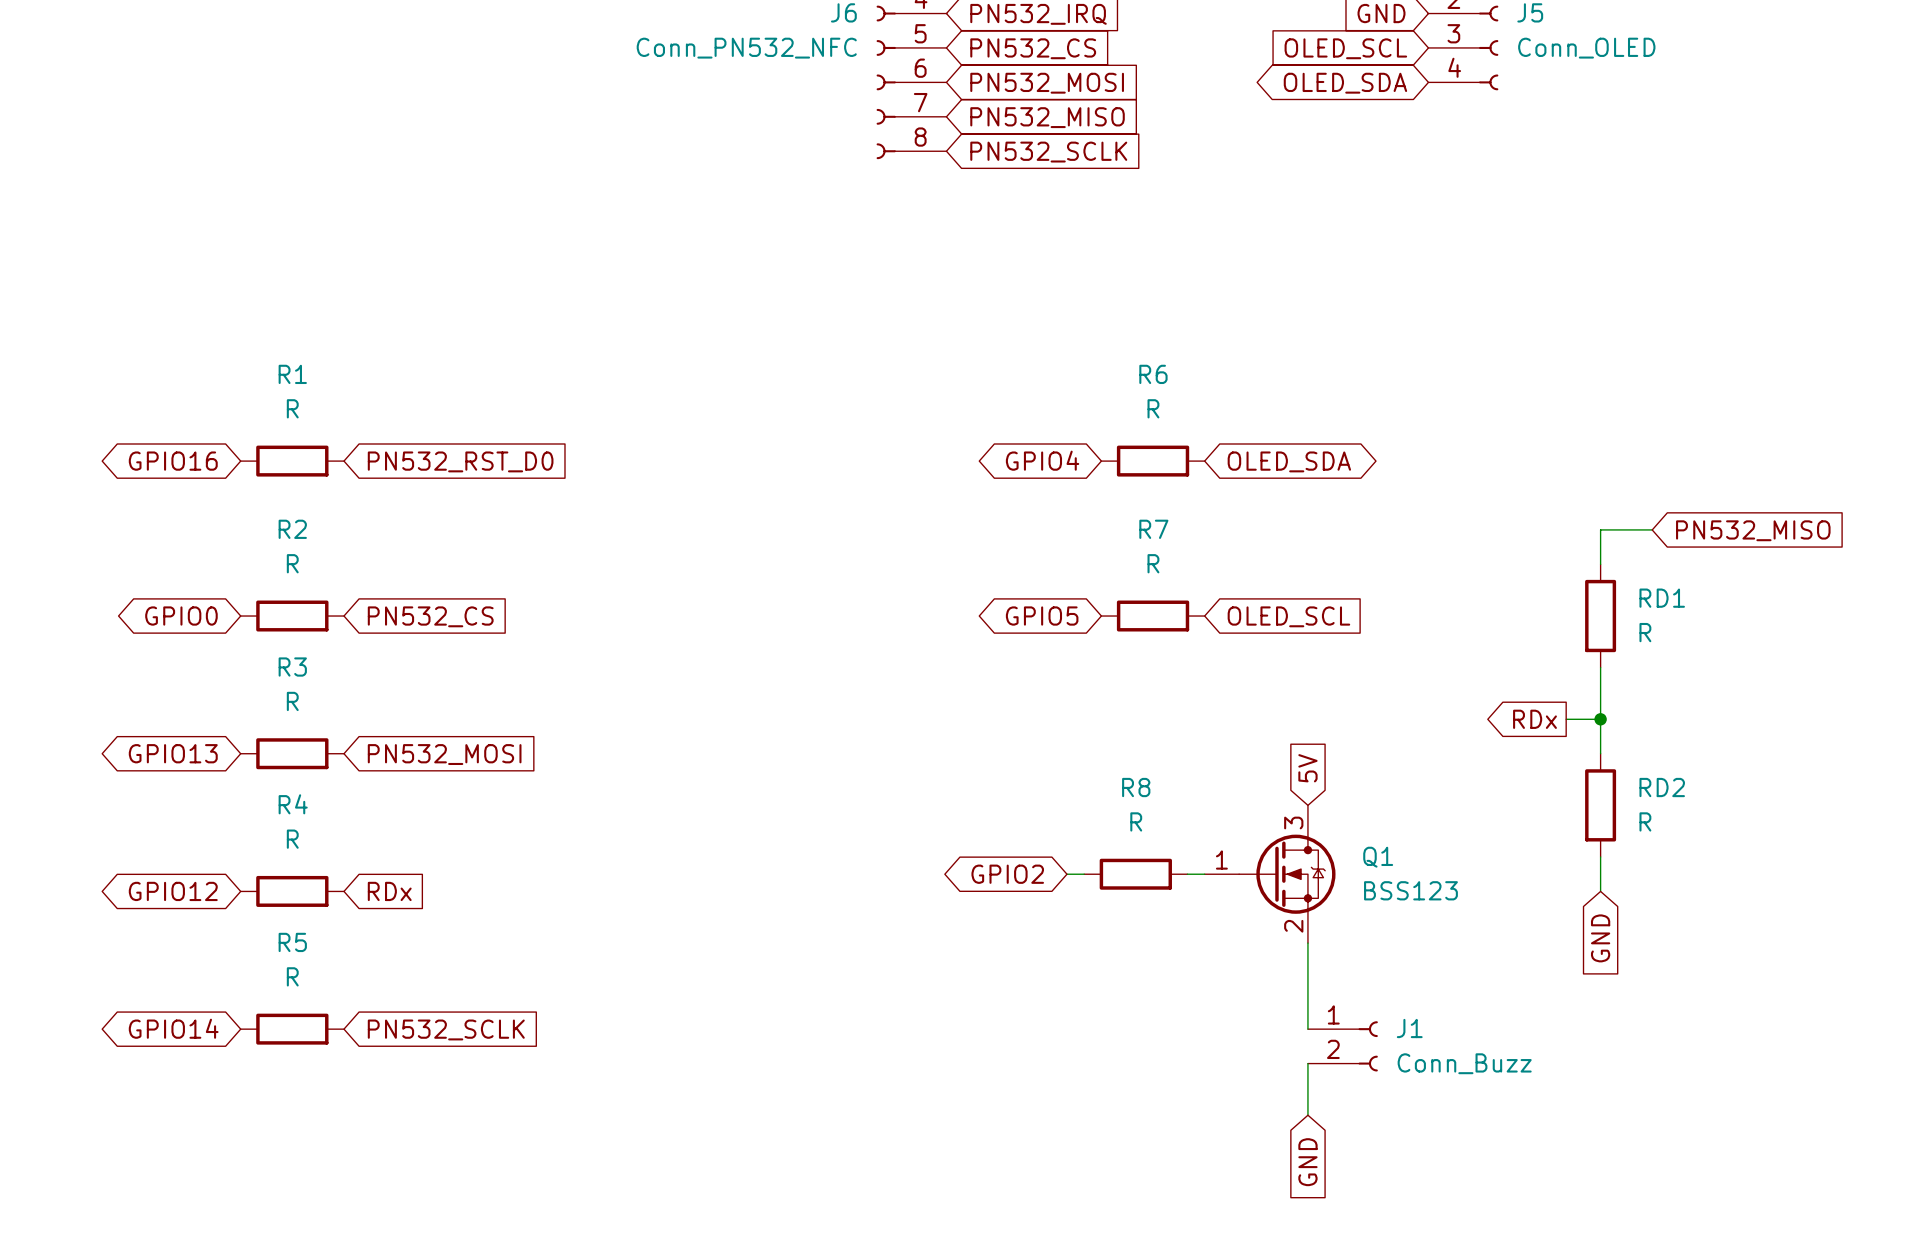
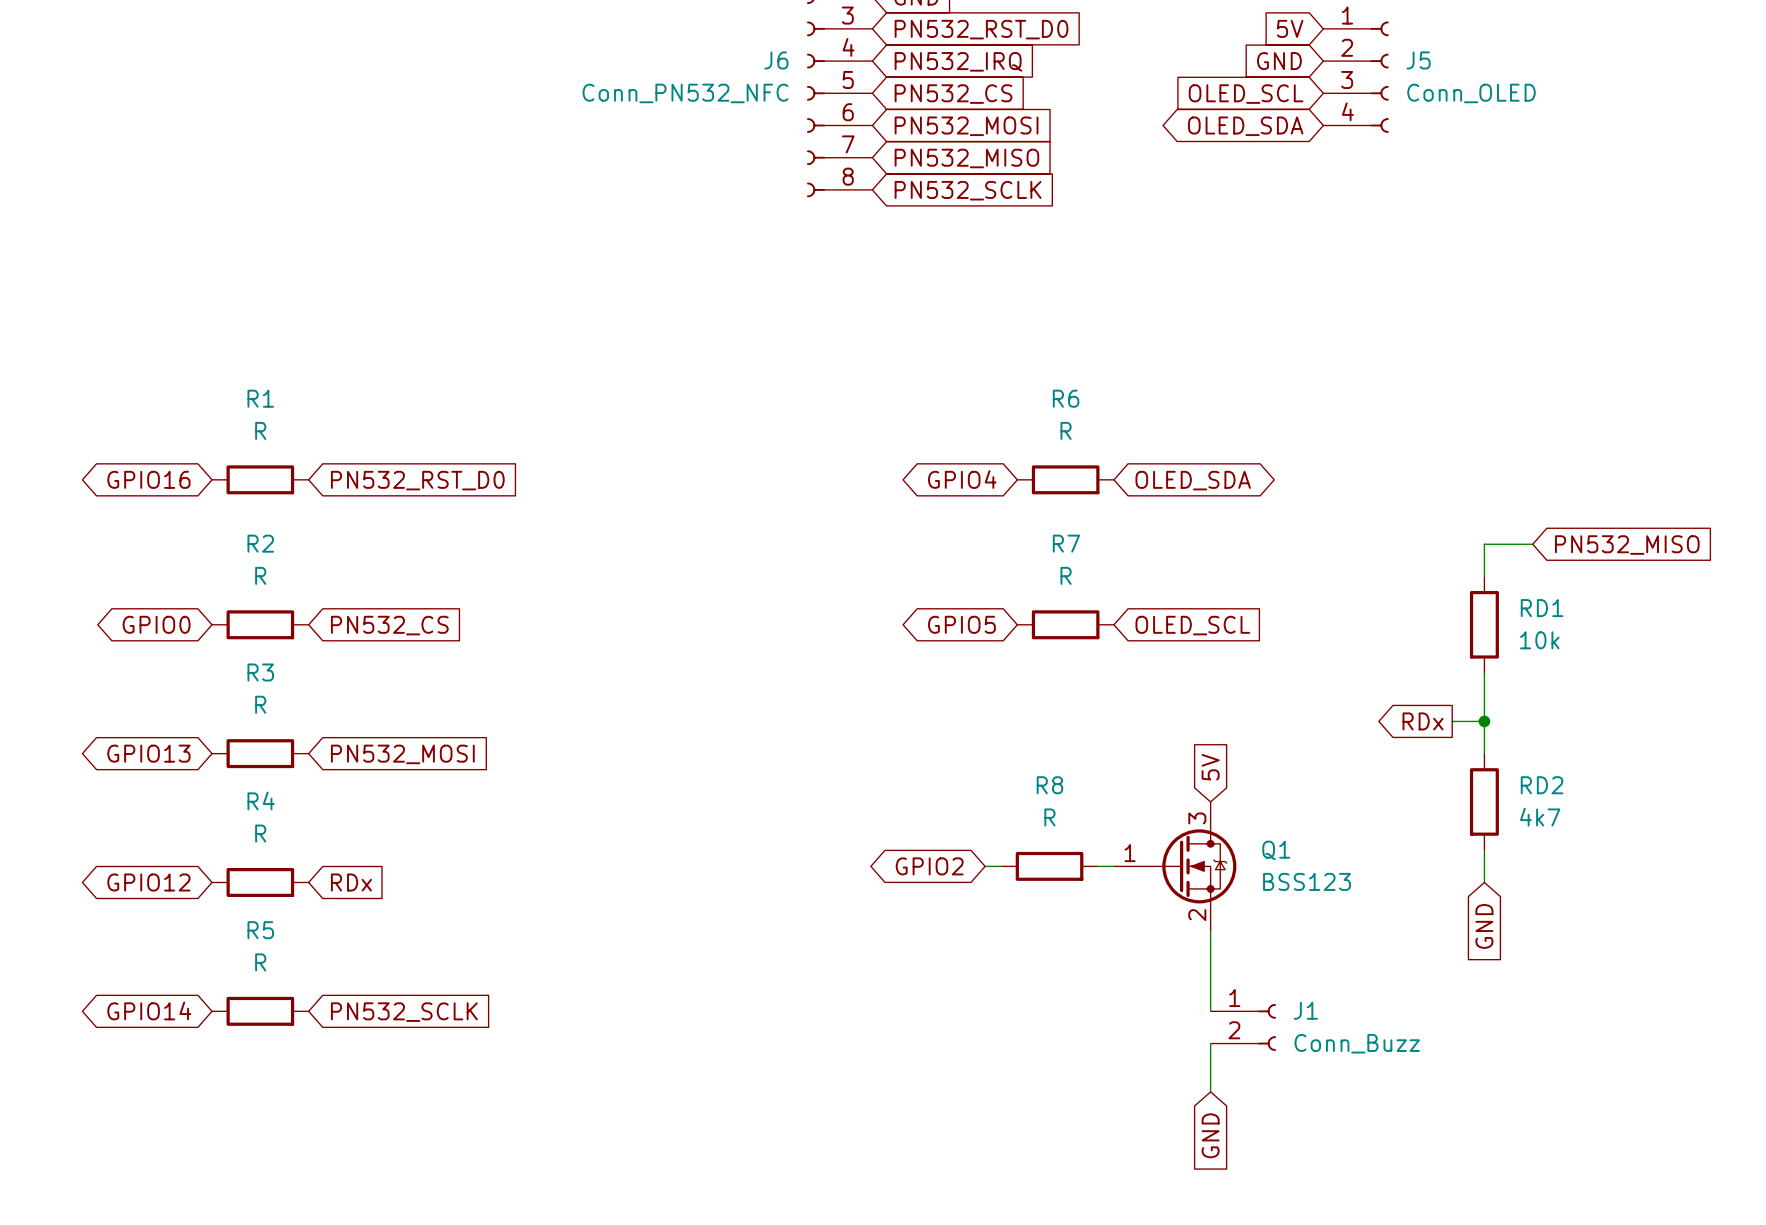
RD1 value: R (1645, 632) -> 10k (1539, 640)
RD2 value: R (1645, 821) -> 4k7 (1540, 817)

